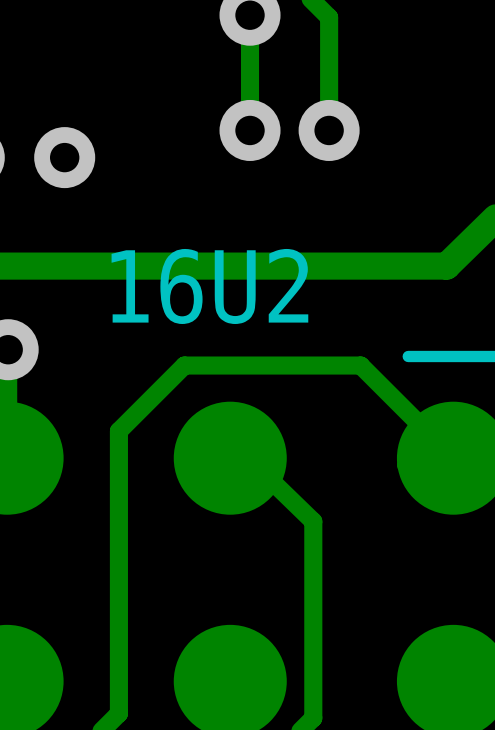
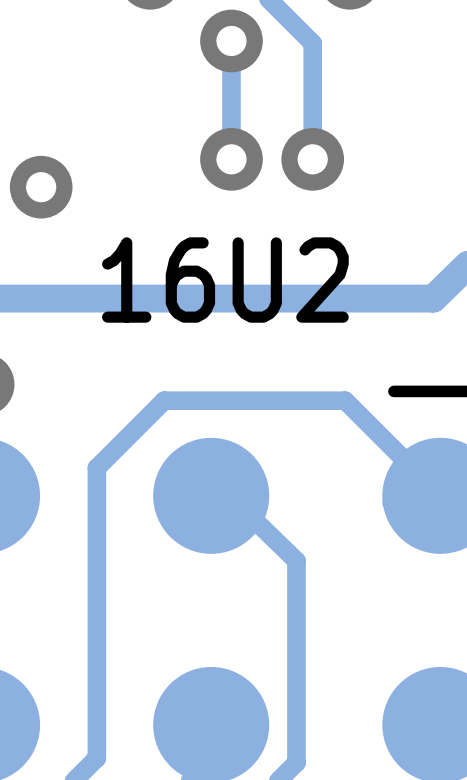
text position: 16U2 (209, 286) -> 16U2 (225, 280)

